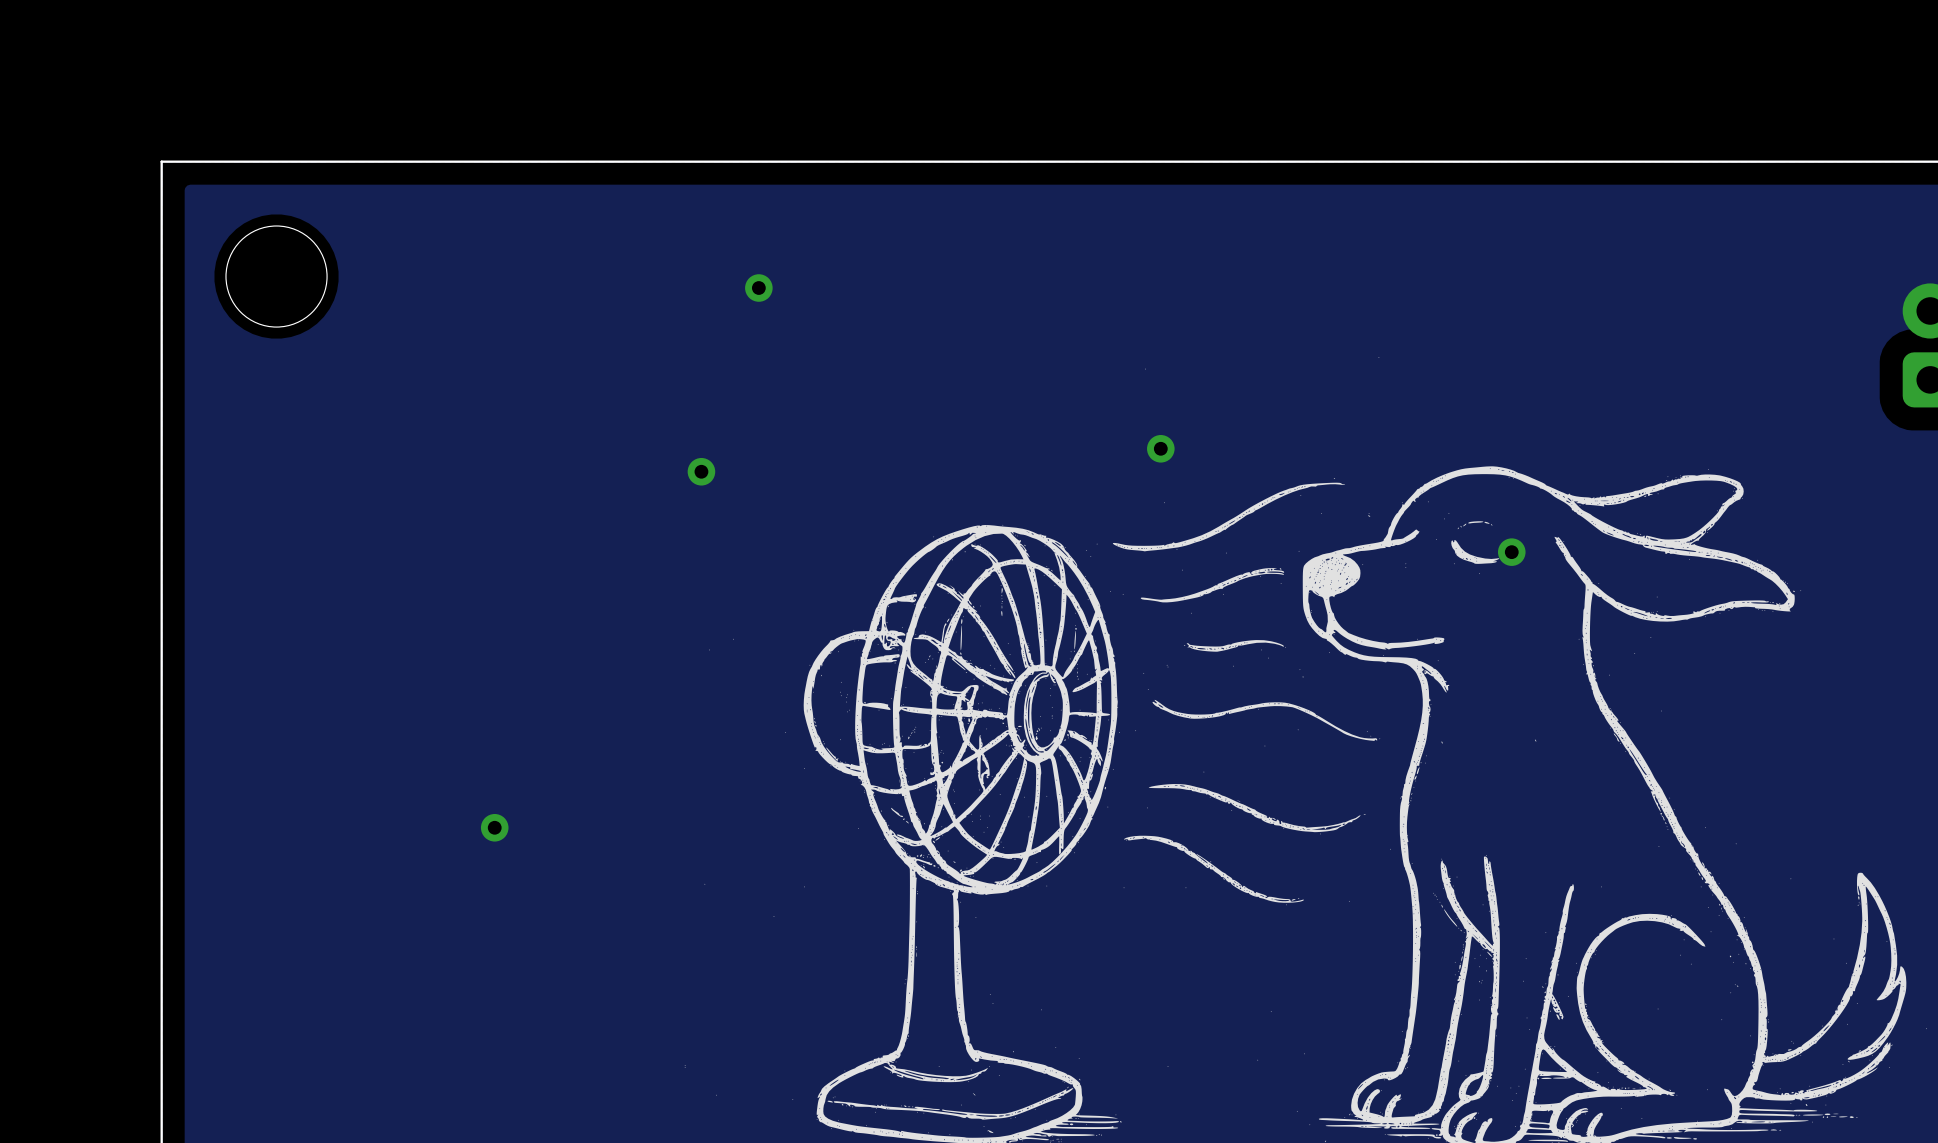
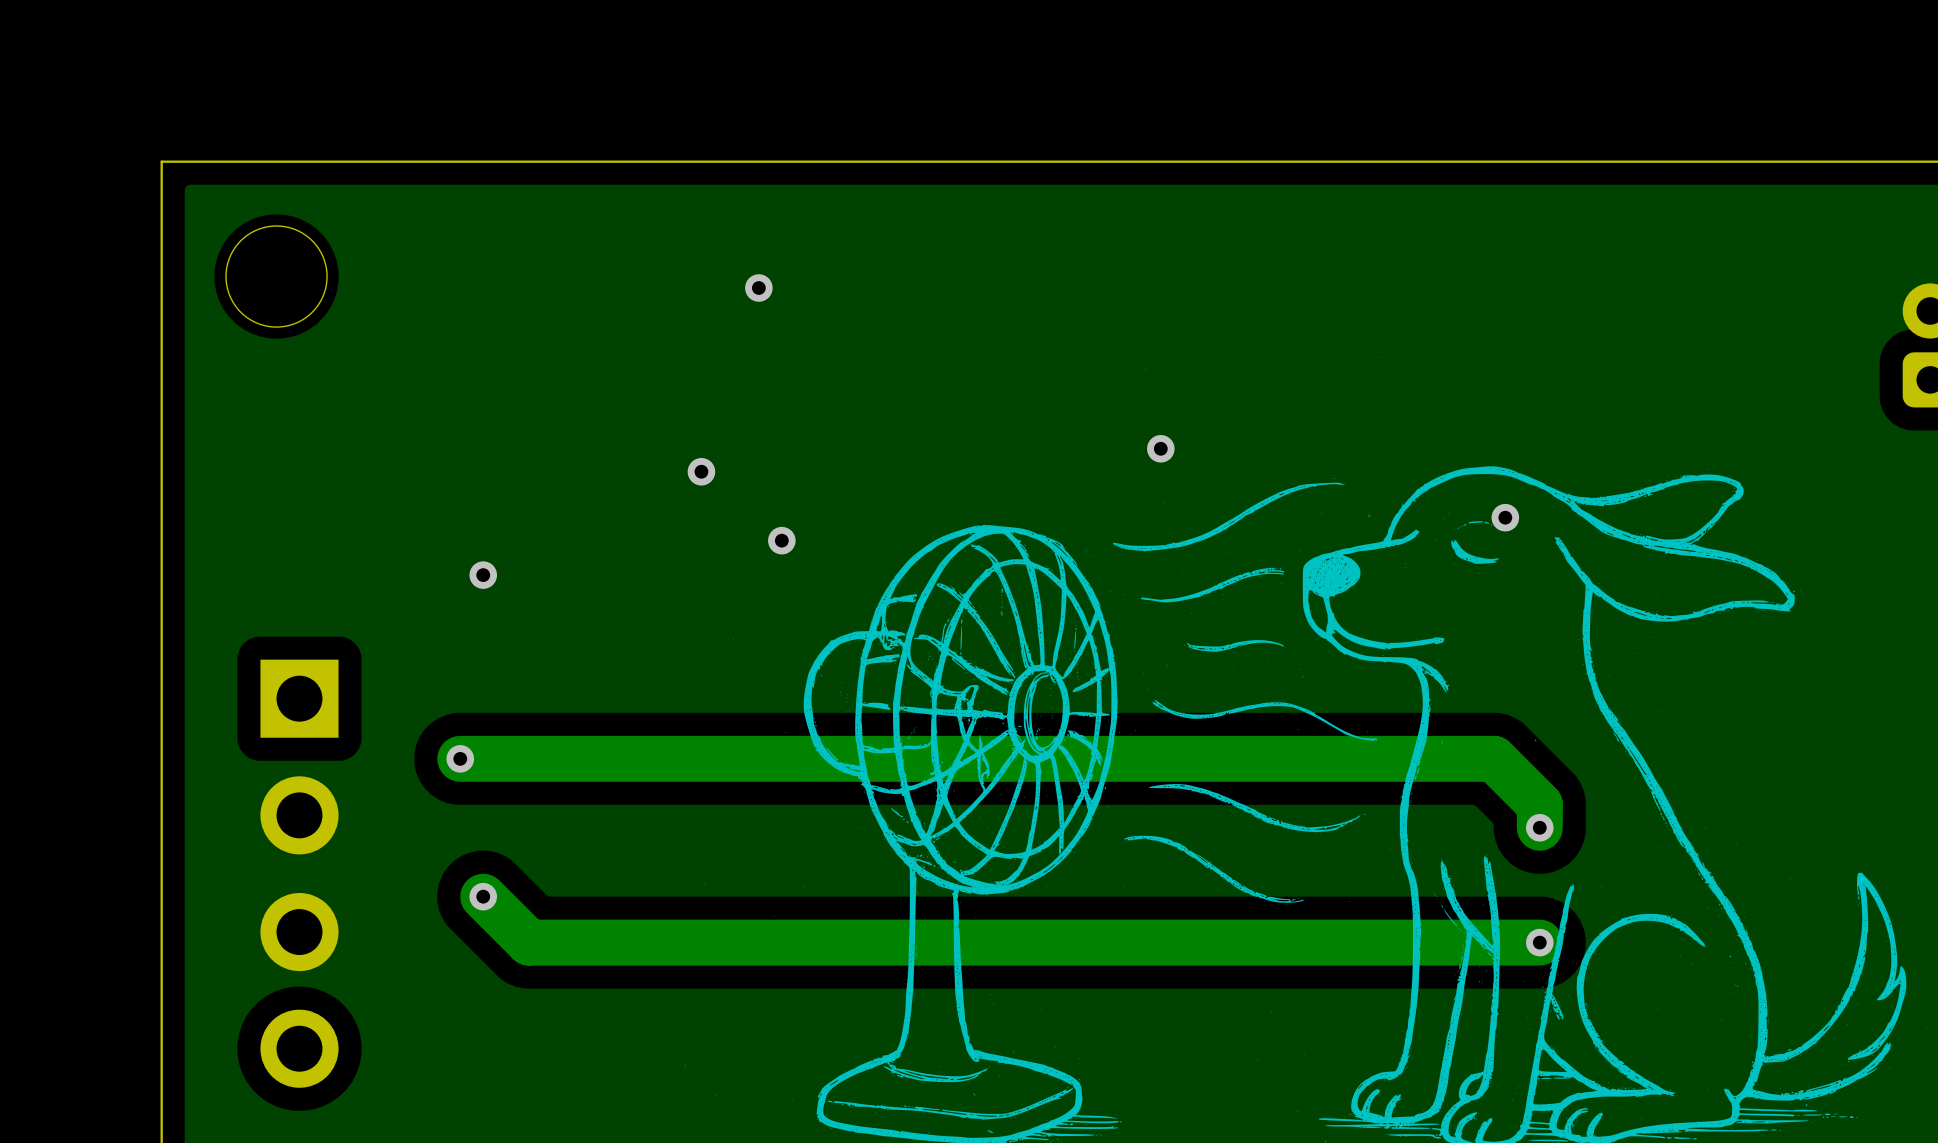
via: none -> (781, 540)
via position: (1511, 552) -> (1505, 517)
via: none -> (483, 575)
track: none -> (460, 758) (1493, 758) (1539, 804) (1539, 827)
via: none -> (460, 758)
via: (494, 827) -> none
via: none -> (1539, 827)
part: none -> (299, 873)
track: none -> (483, 896) (529, 942) (1539, 942)
via: none -> (483, 896)
via: none -> (1539, 942)

